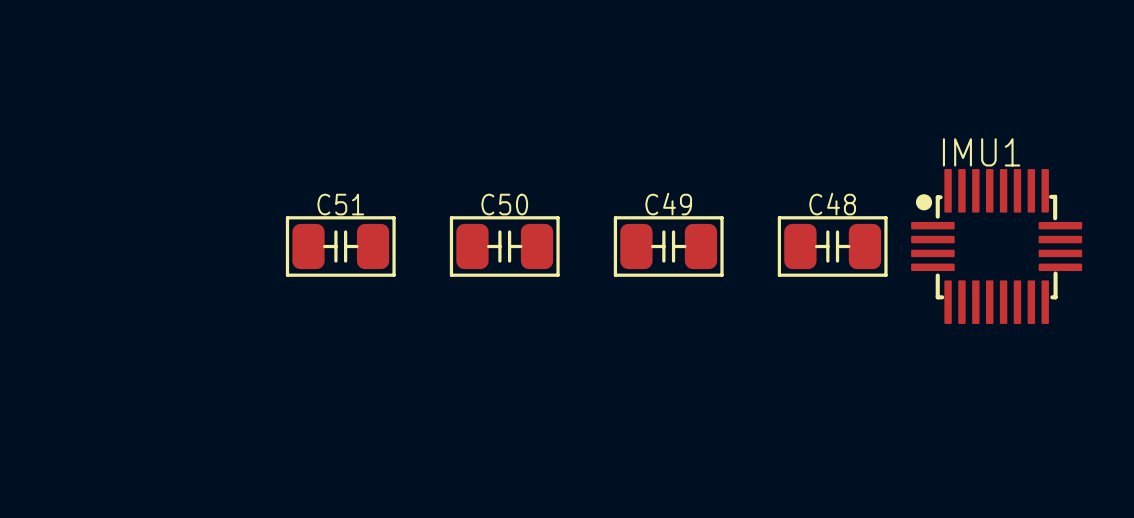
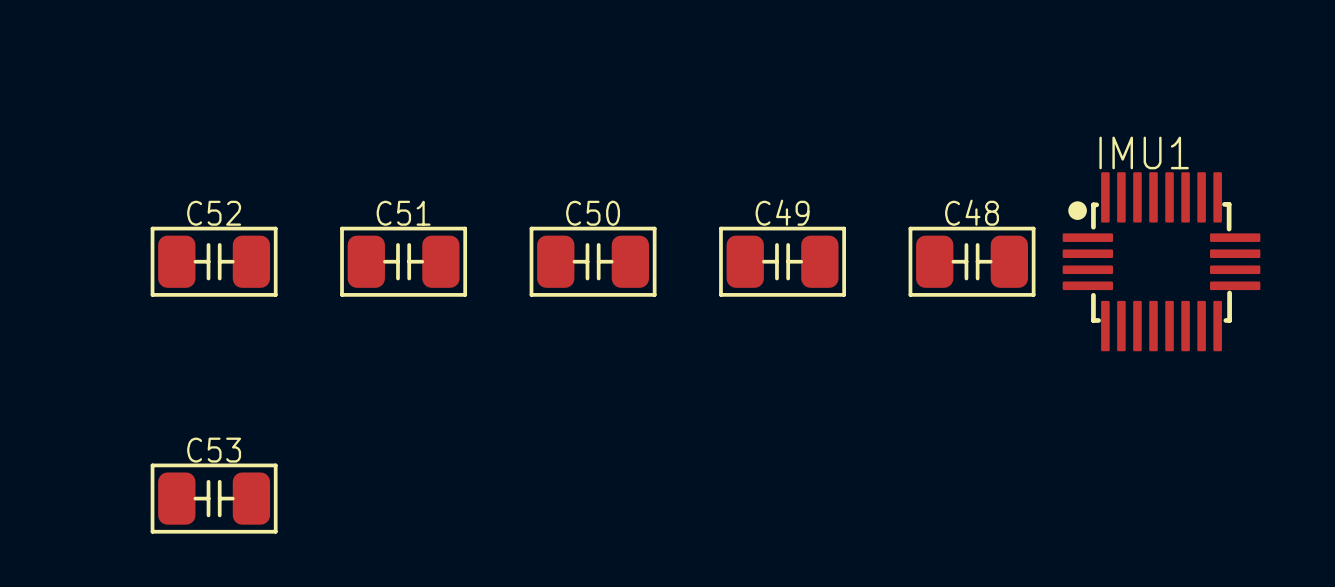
C52: none -> (214, 261)
C53: none -> (214, 498)

